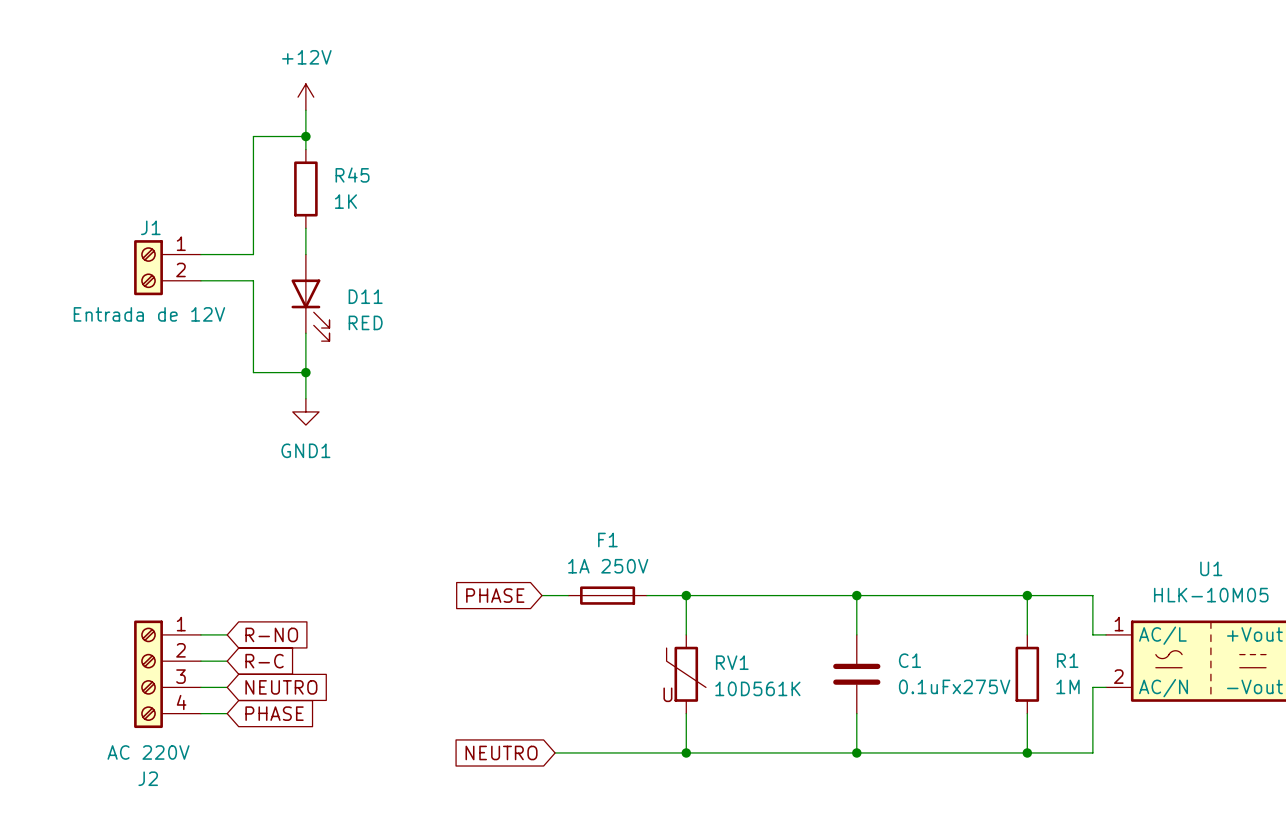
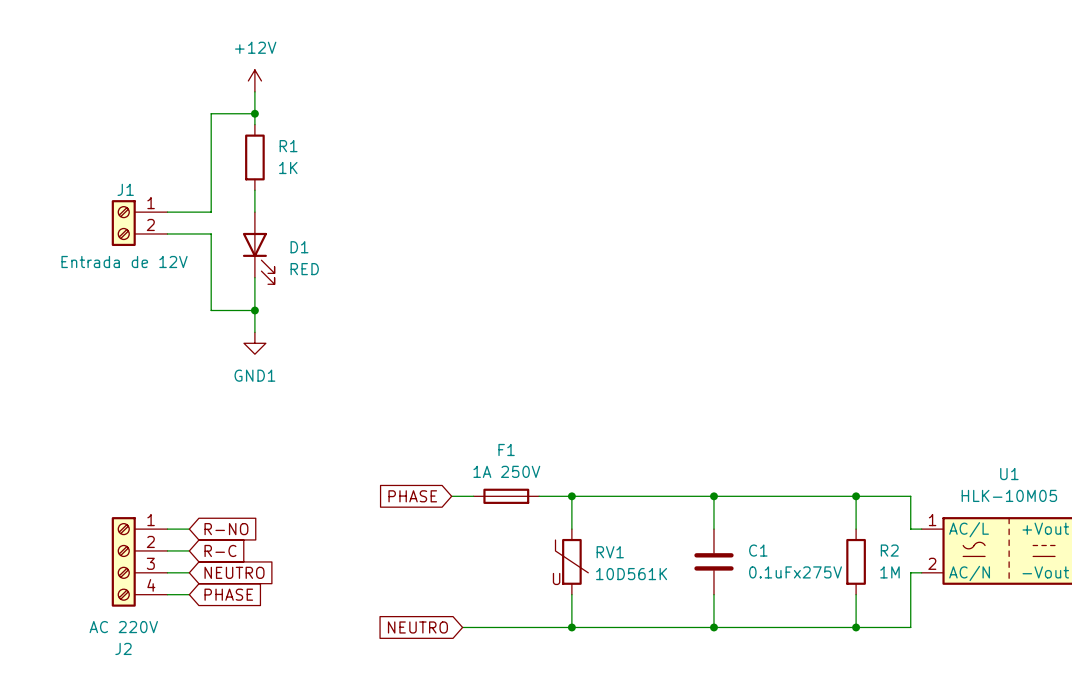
R45 name: R45 (352, 175) -> R1 (288, 146)
D11 name: D11 (365, 296) -> D1 (299, 247)
R1 name: R1 (1067, 660) -> R2 (889, 550)

